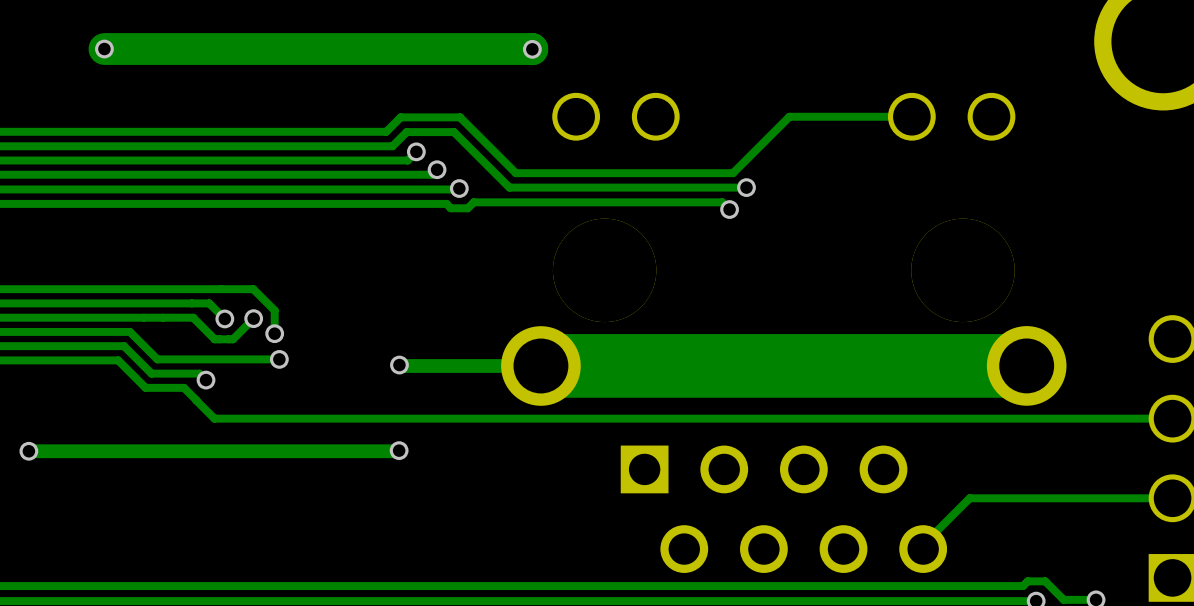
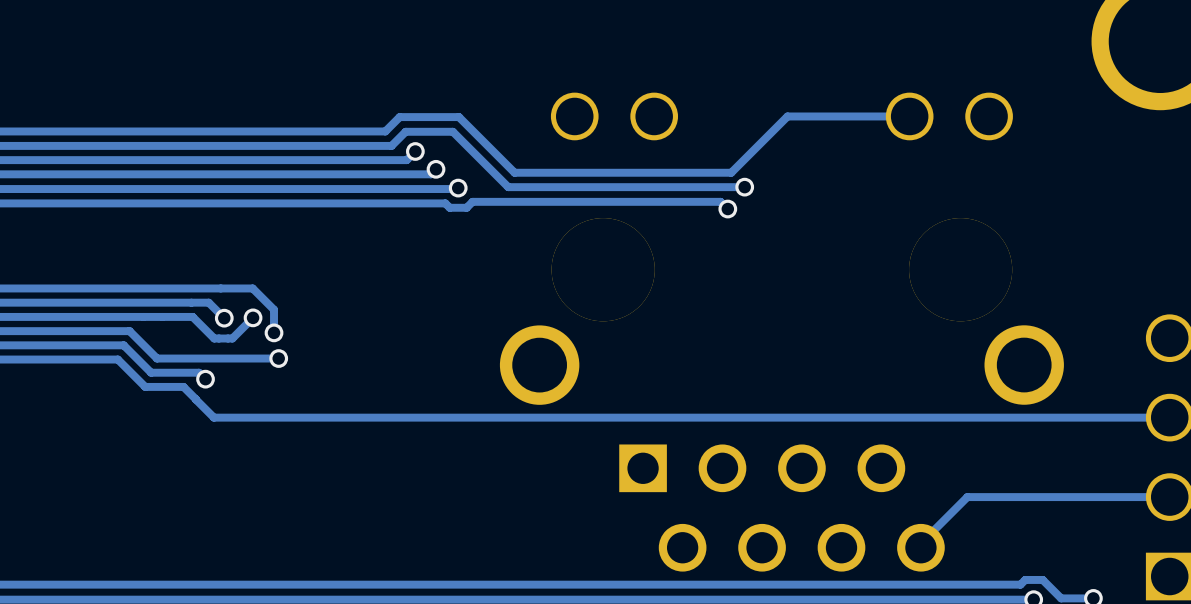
via: (104, 49) -> none
track: (532, 49) (104, 49) -> none
via: (532, 49) -> none
track: (399, 365) (540, 366) -> none
via: (399, 365) -> none
track: (1026, 365) (541, 365) -> none
track: (399, 450) (28, 451) -> none
via: (399, 450) -> none
via: (28, 451) -> none

